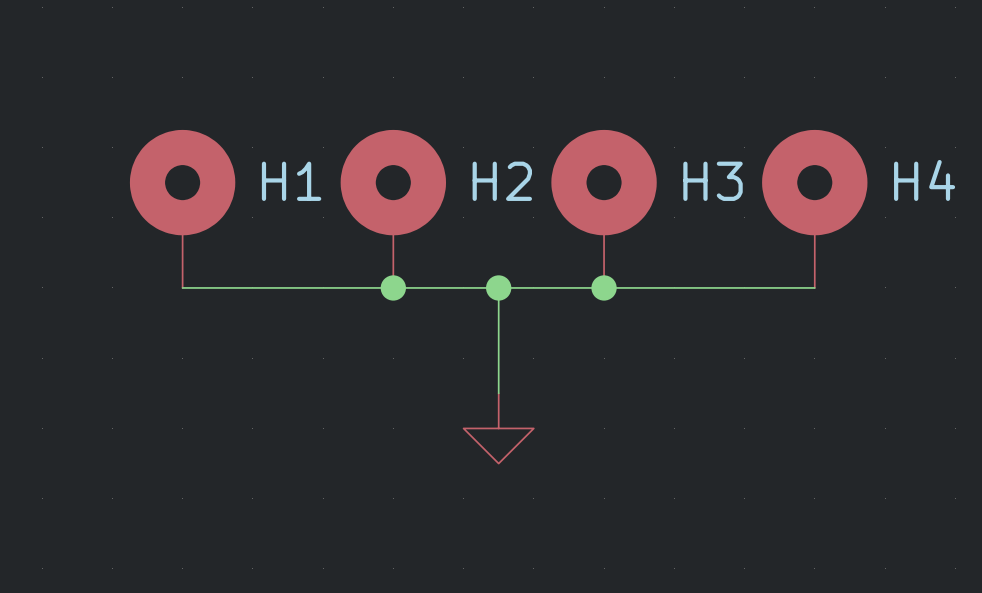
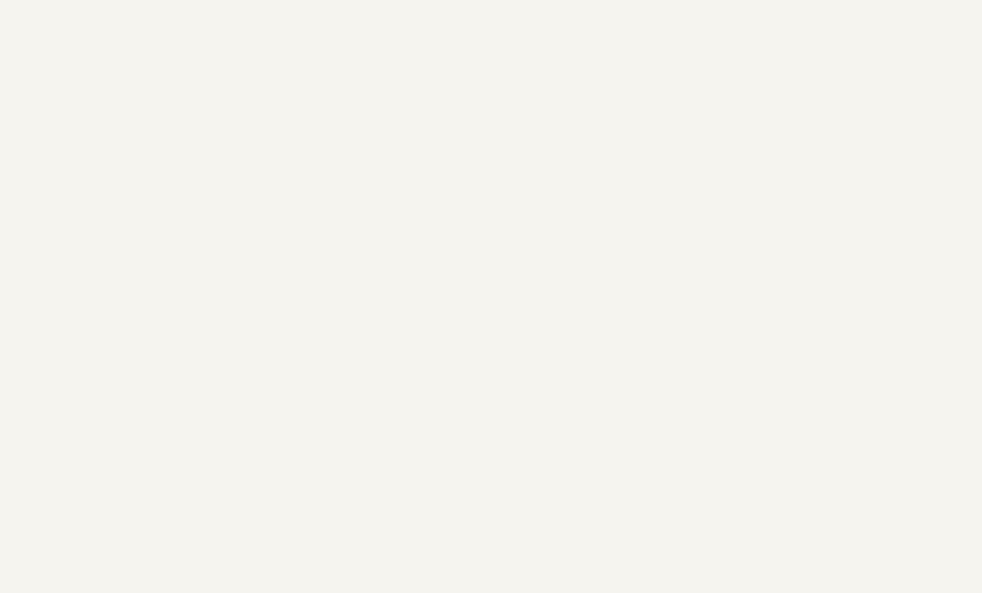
H1: (182, 208) -> none
H2: (393, 208) -> none
H3: (604, 208) -> none
H4: (814, 208) -> none
wire: (182, 287) (814, 287) -> none
junction: (393, 287) -> none
wire: (498, 287) (498, 393) -> none
junction: (498, 287) -> none
junction: (604, 287) -> none
power symbol: (498, 428) -> none

